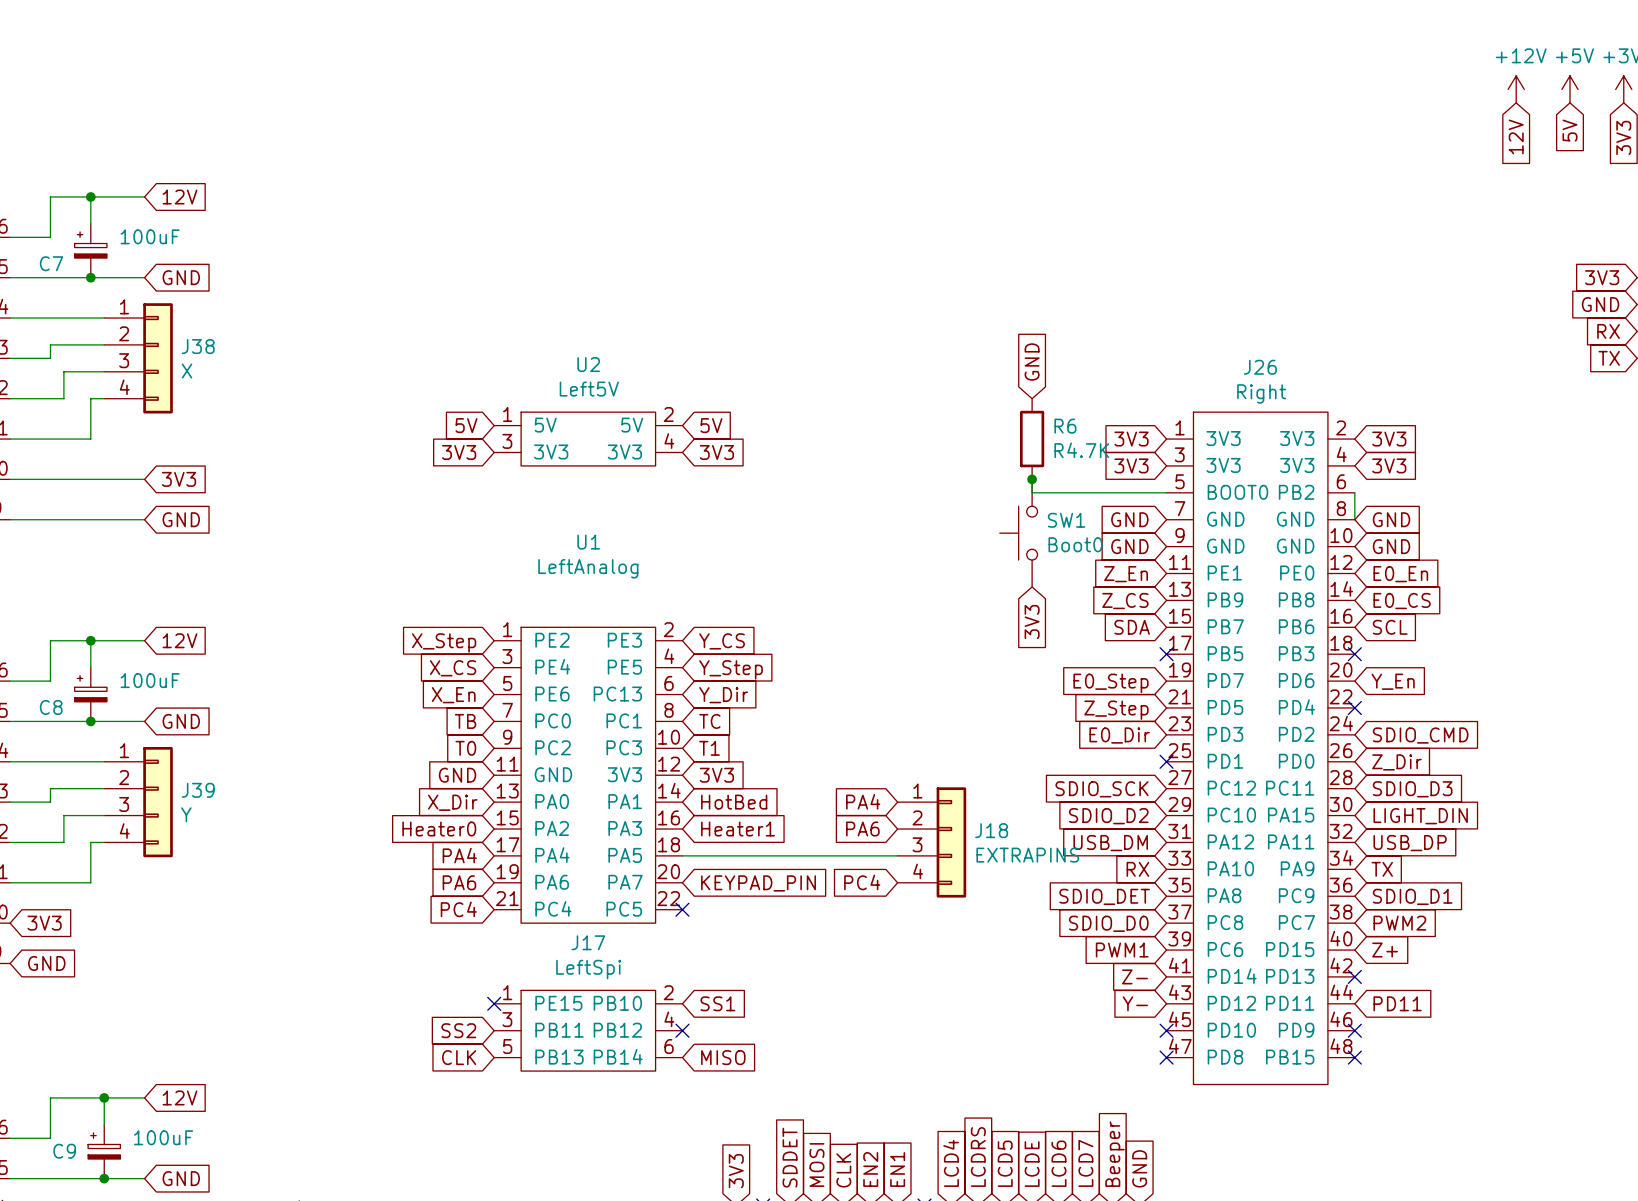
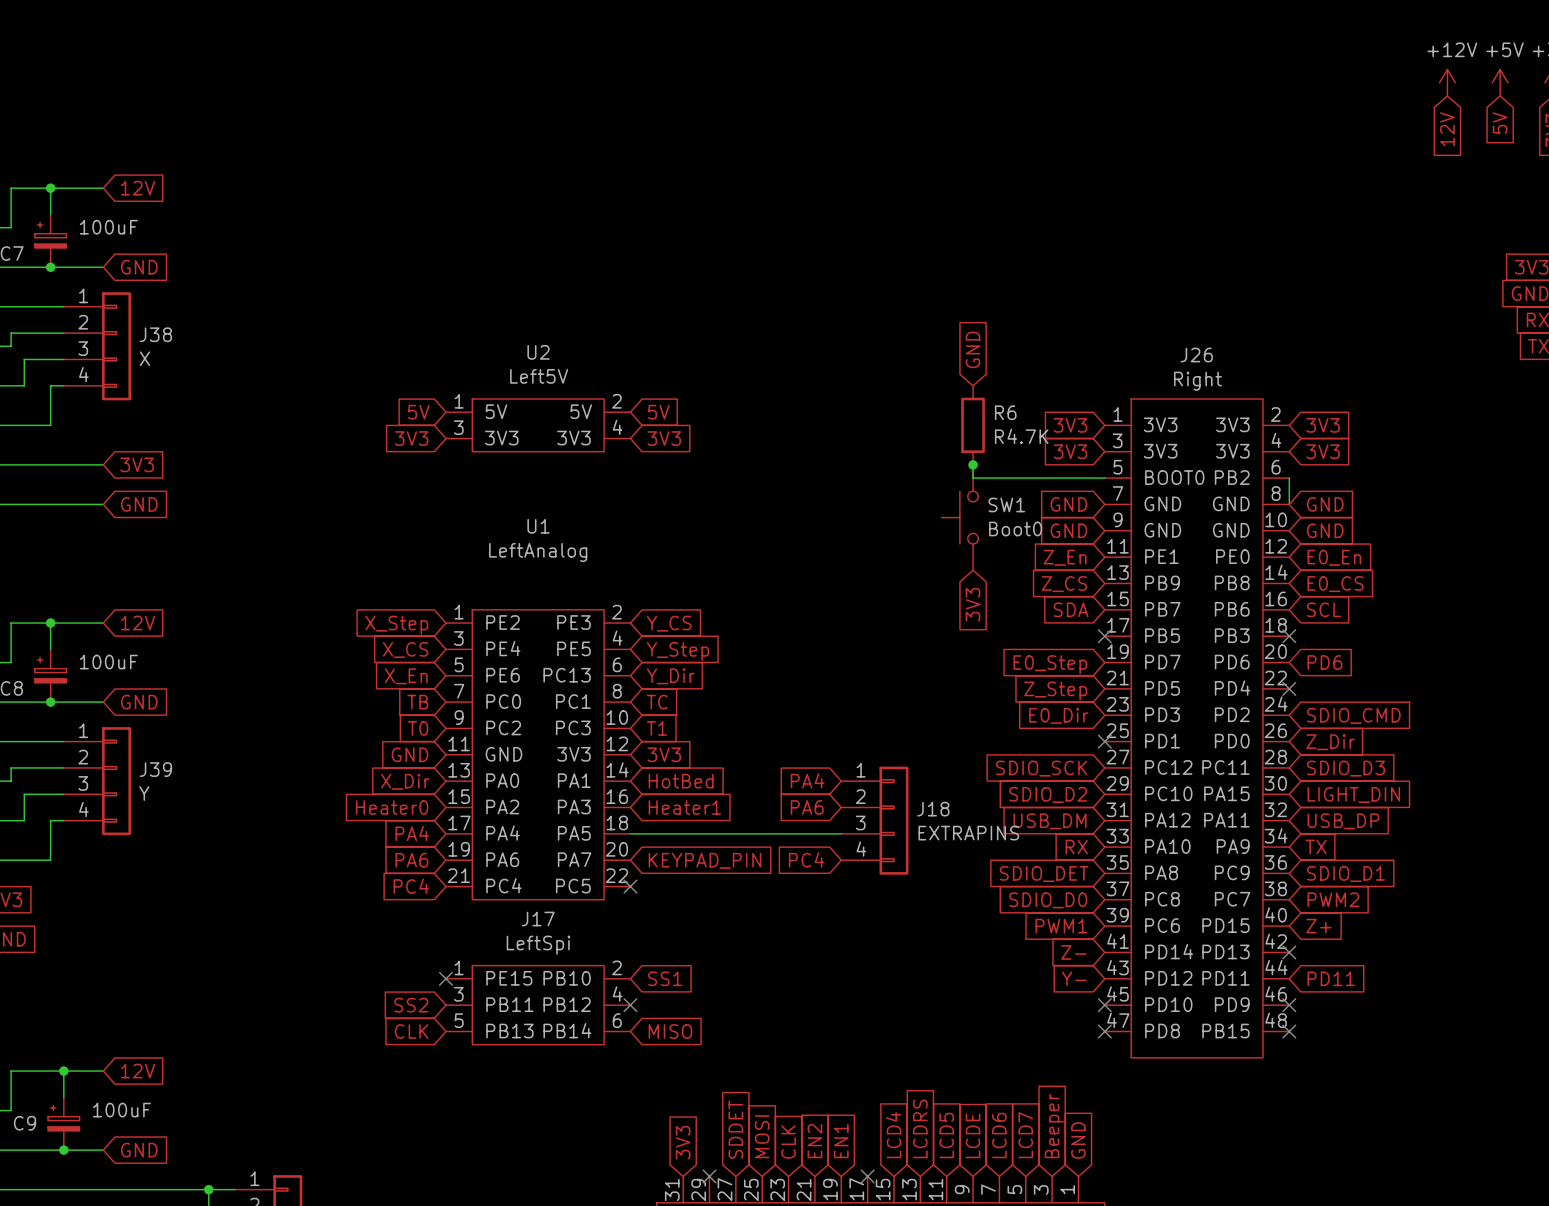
global label: Y_En (1393, 681) -> PD6 (1324, 662)

